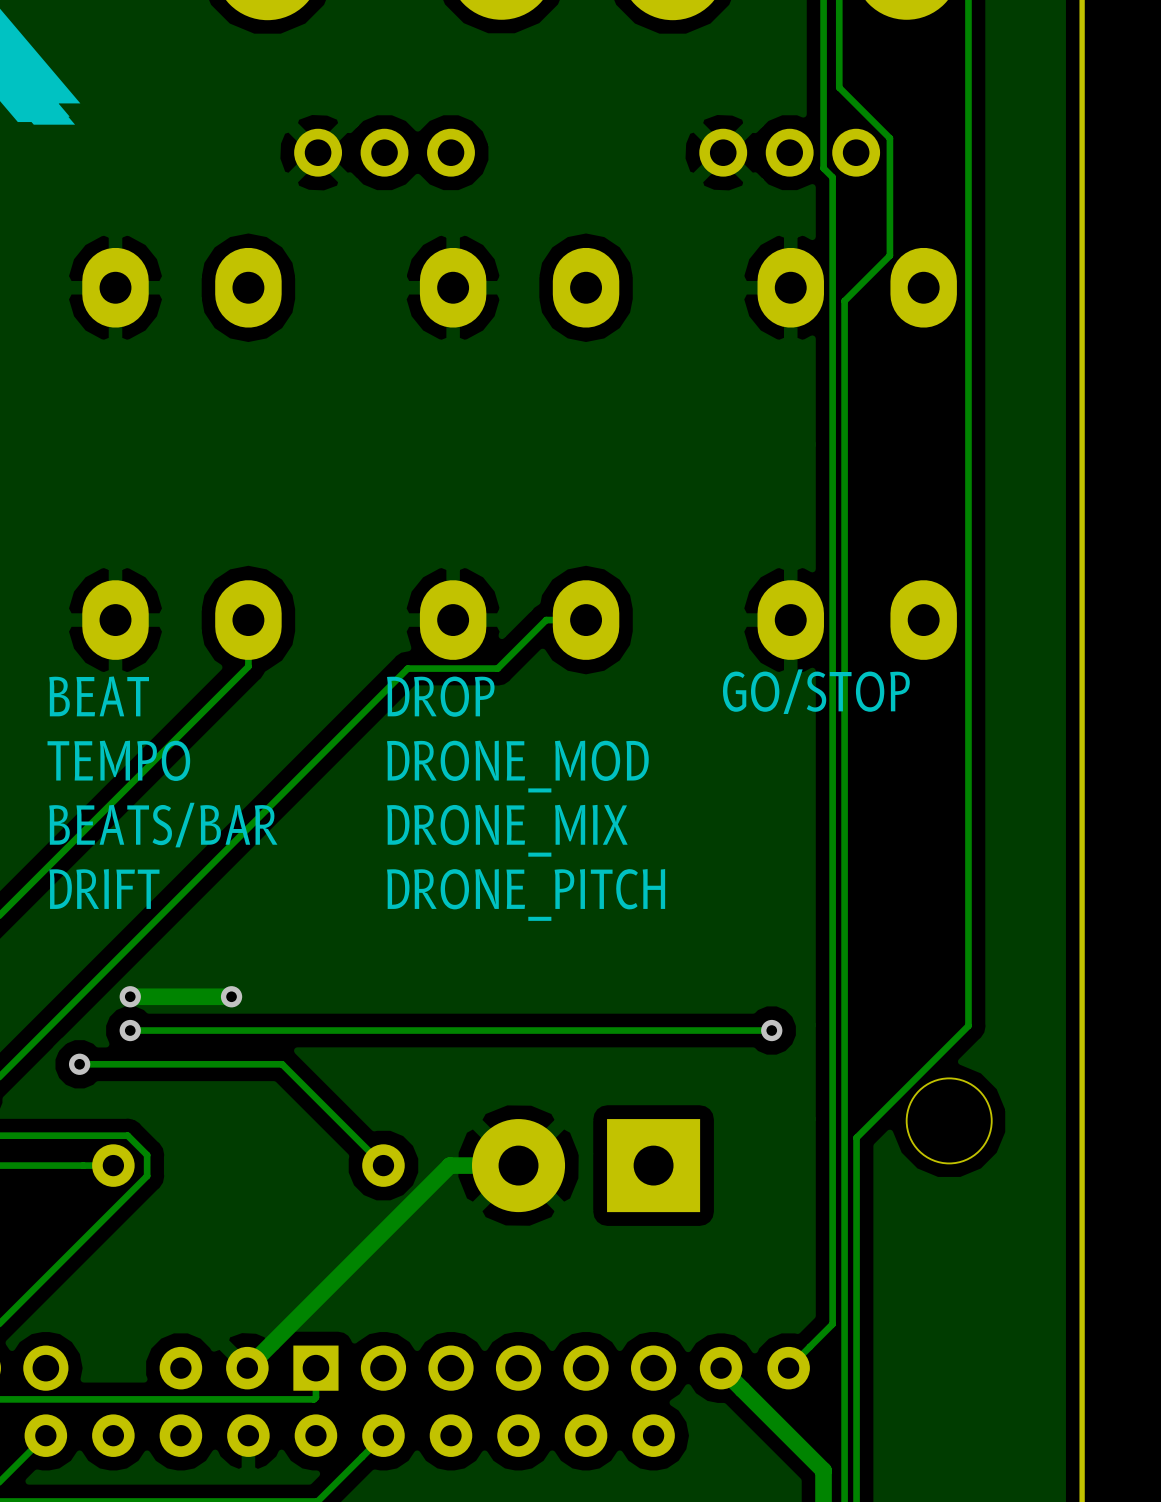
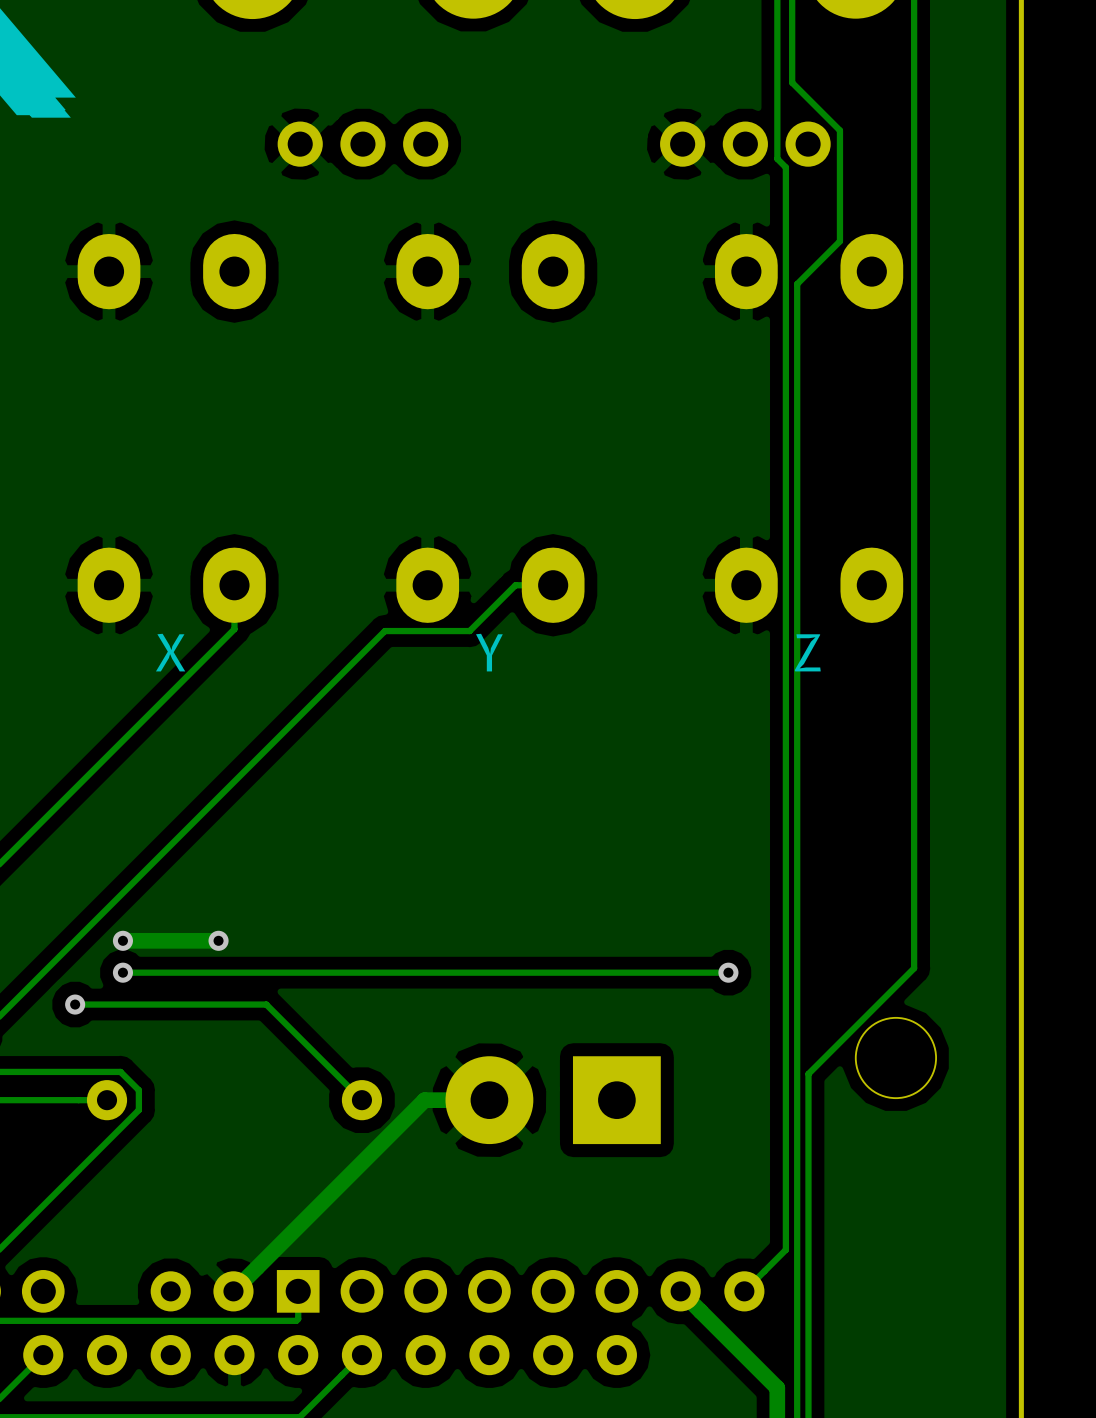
text: none -> X (170, 652)
text: none -> Y (489, 652)
text: GO/STOP (816, 691) -> none
text: none -> Z (807, 652)
text: BEAT (99, 696) -> none
text: DROP (440, 696) -> none
text: TEMPO (118, 760) -> none
text: DRONE_MOD (517, 766) -> none
text: BEATS/BAR (163, 825) -> none
text: DRONE_MIX (507, 830) -> none
text: DRIFT (104, 889) -> none
text: DRONE_PITCH (526, 894) -> none

